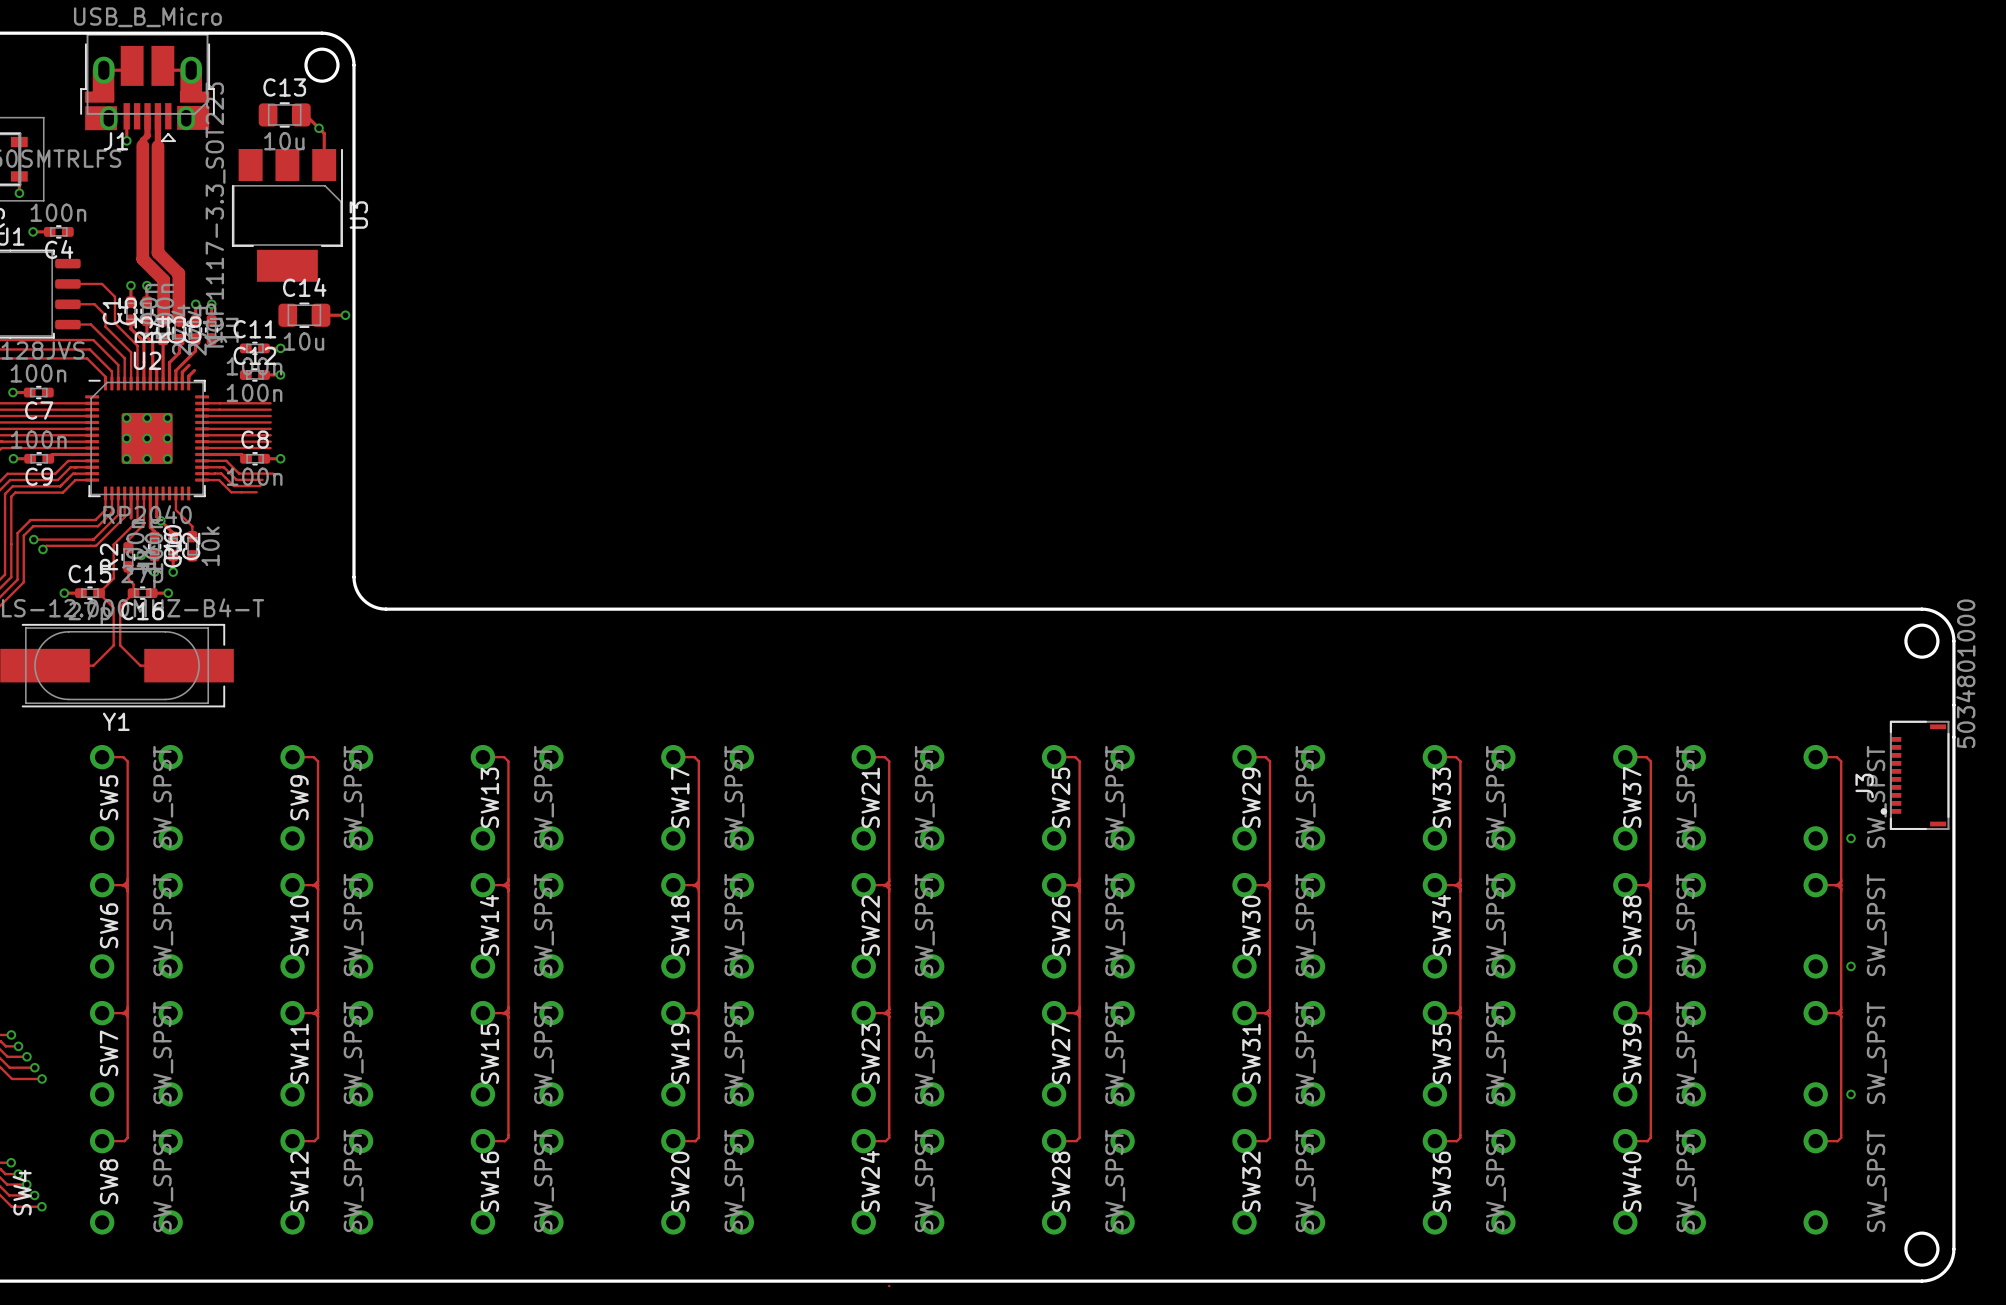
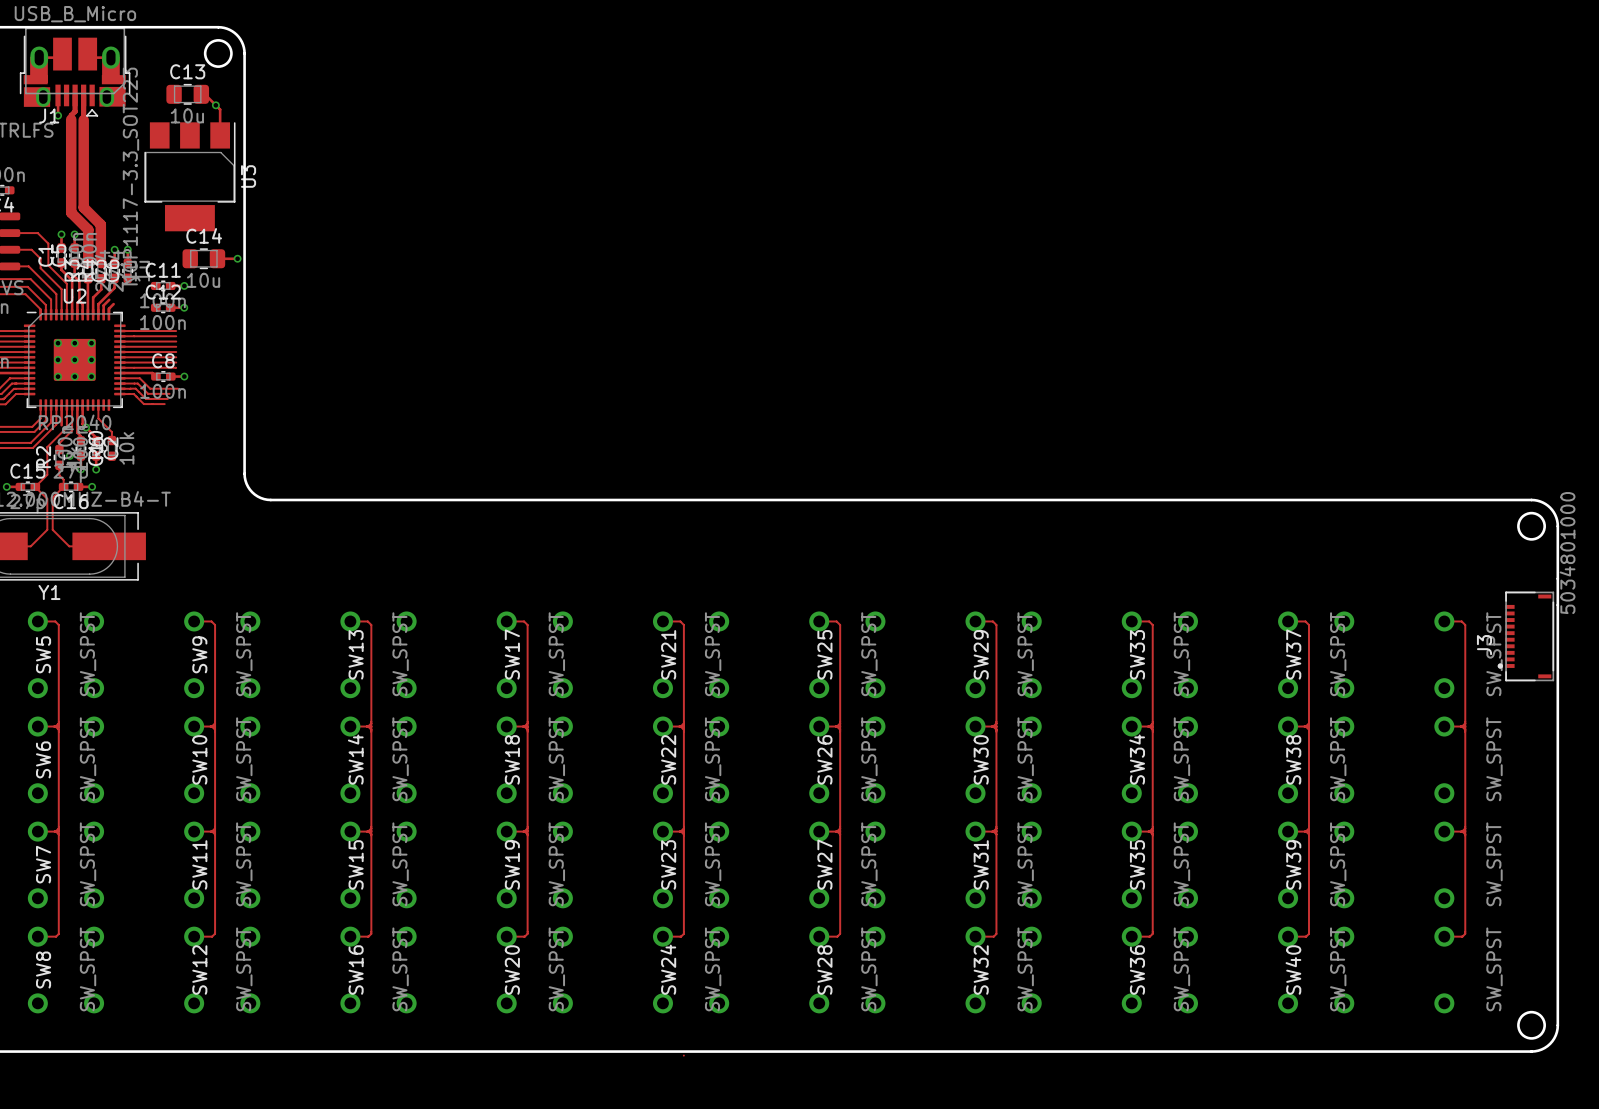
via: (1851, 838) -> none
via: (1851, 966) -> none
via: (1851, 1094) -> none

